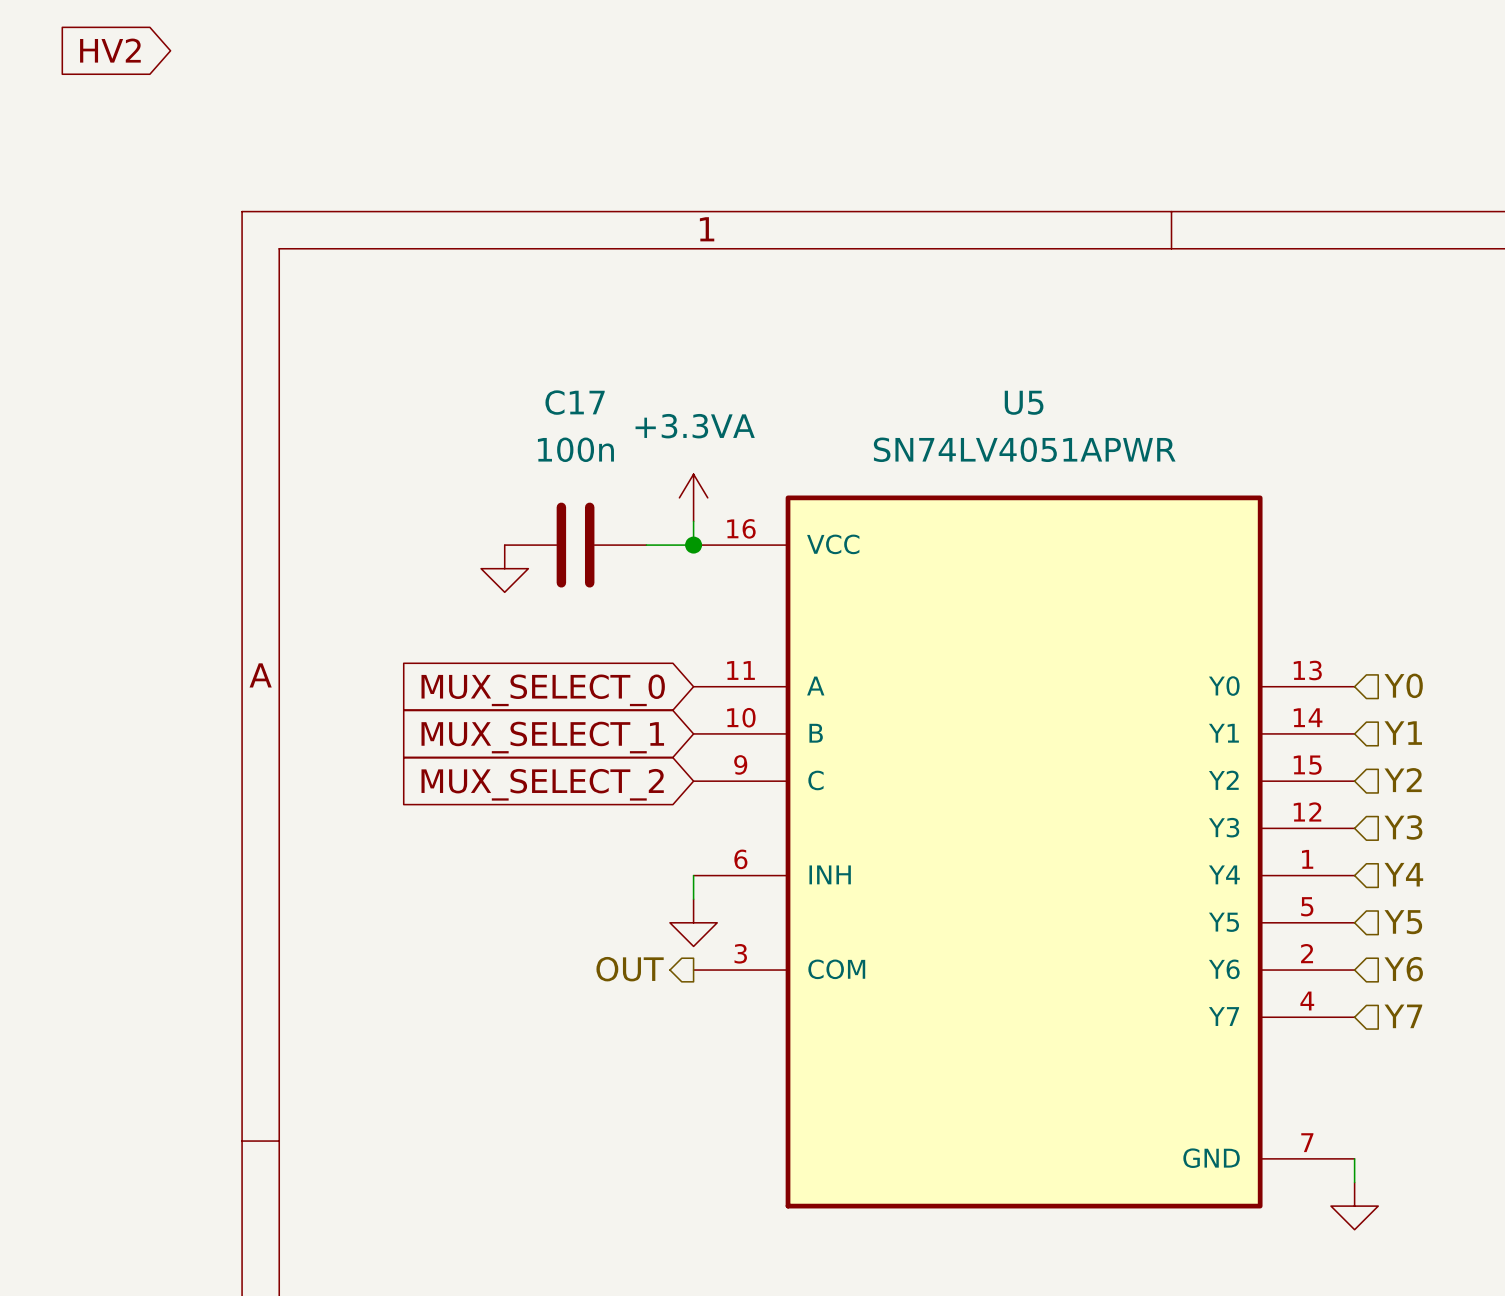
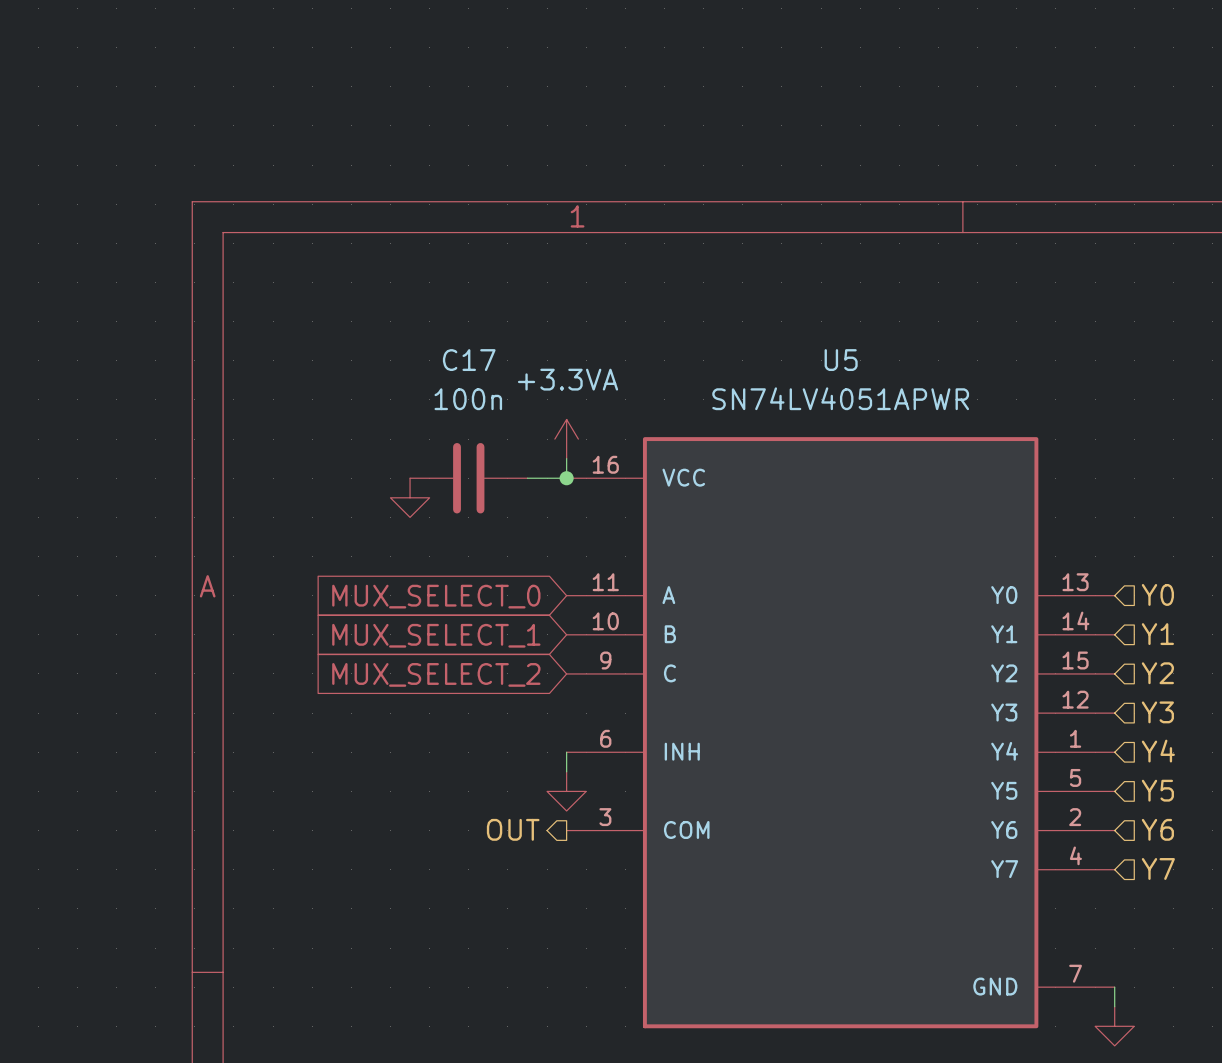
global label: HV2 (110, 50) -> none

